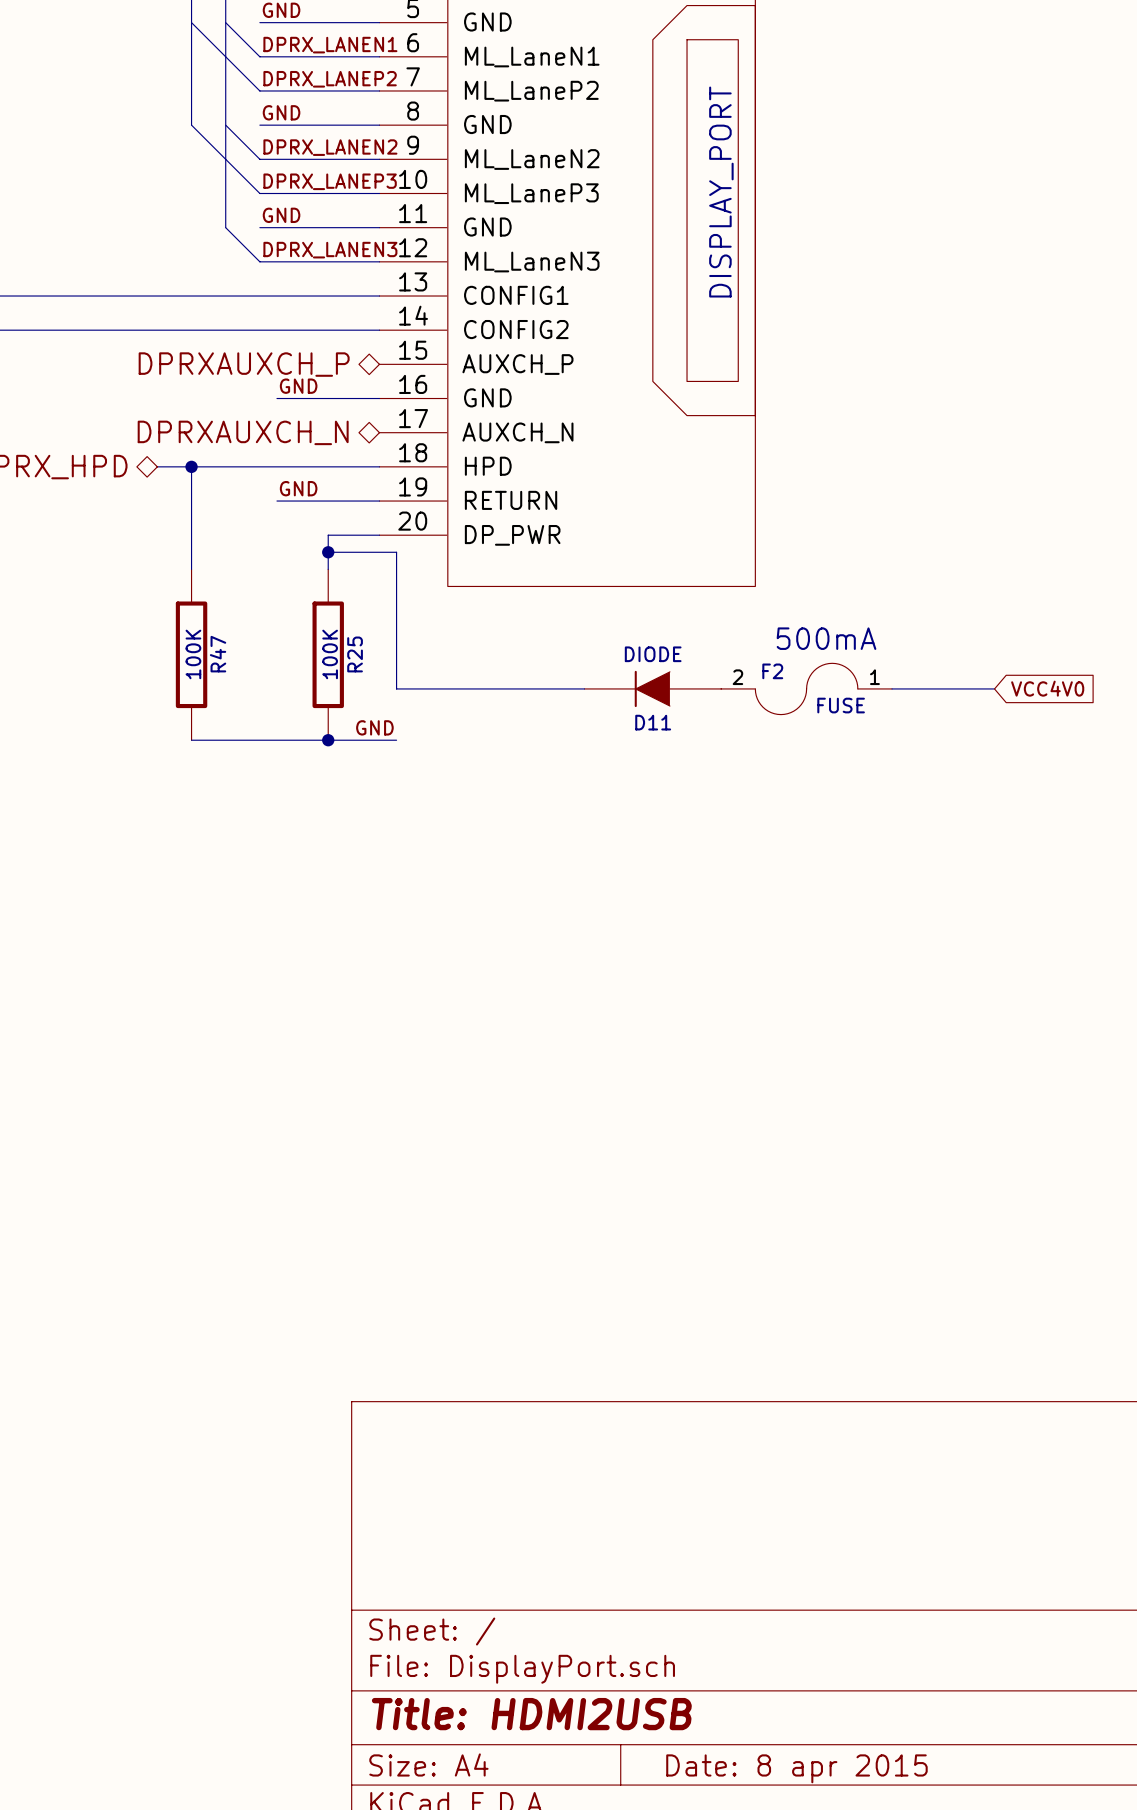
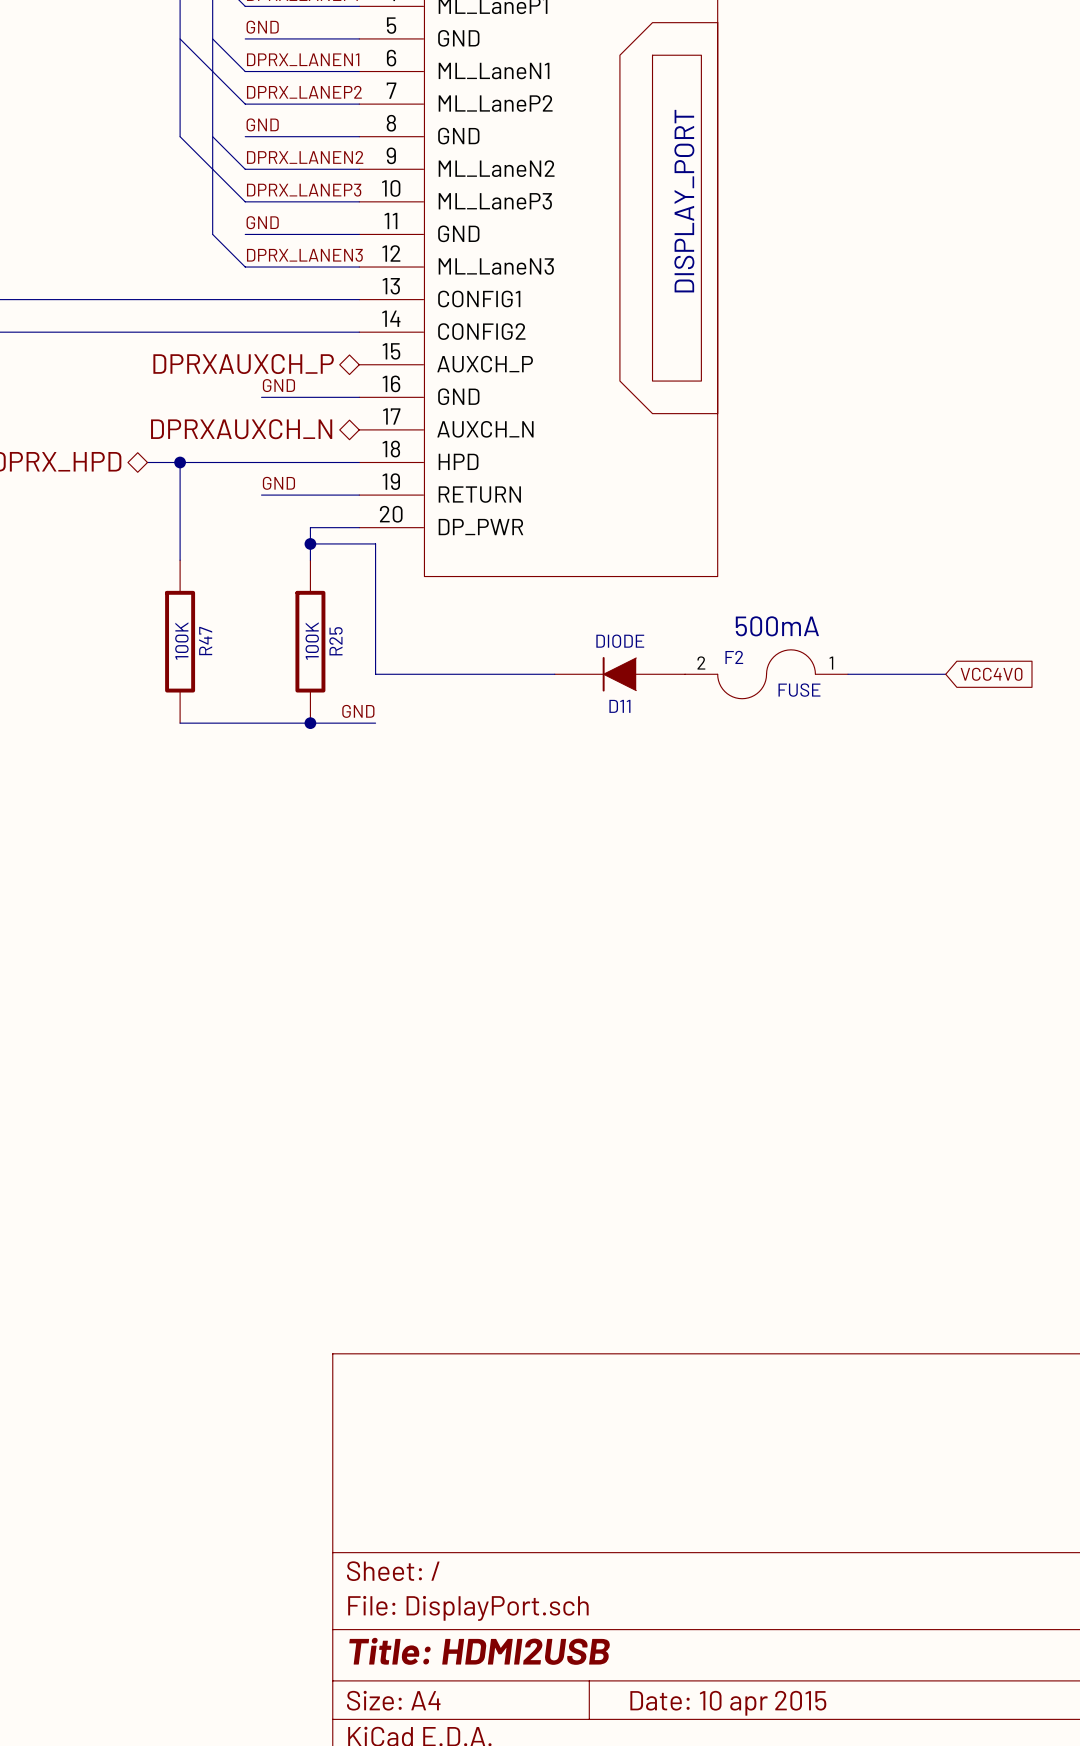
title block: Date: 8 apr 2015 (796, 1768) -> Date: 10 apr 2015 (728, 1703)

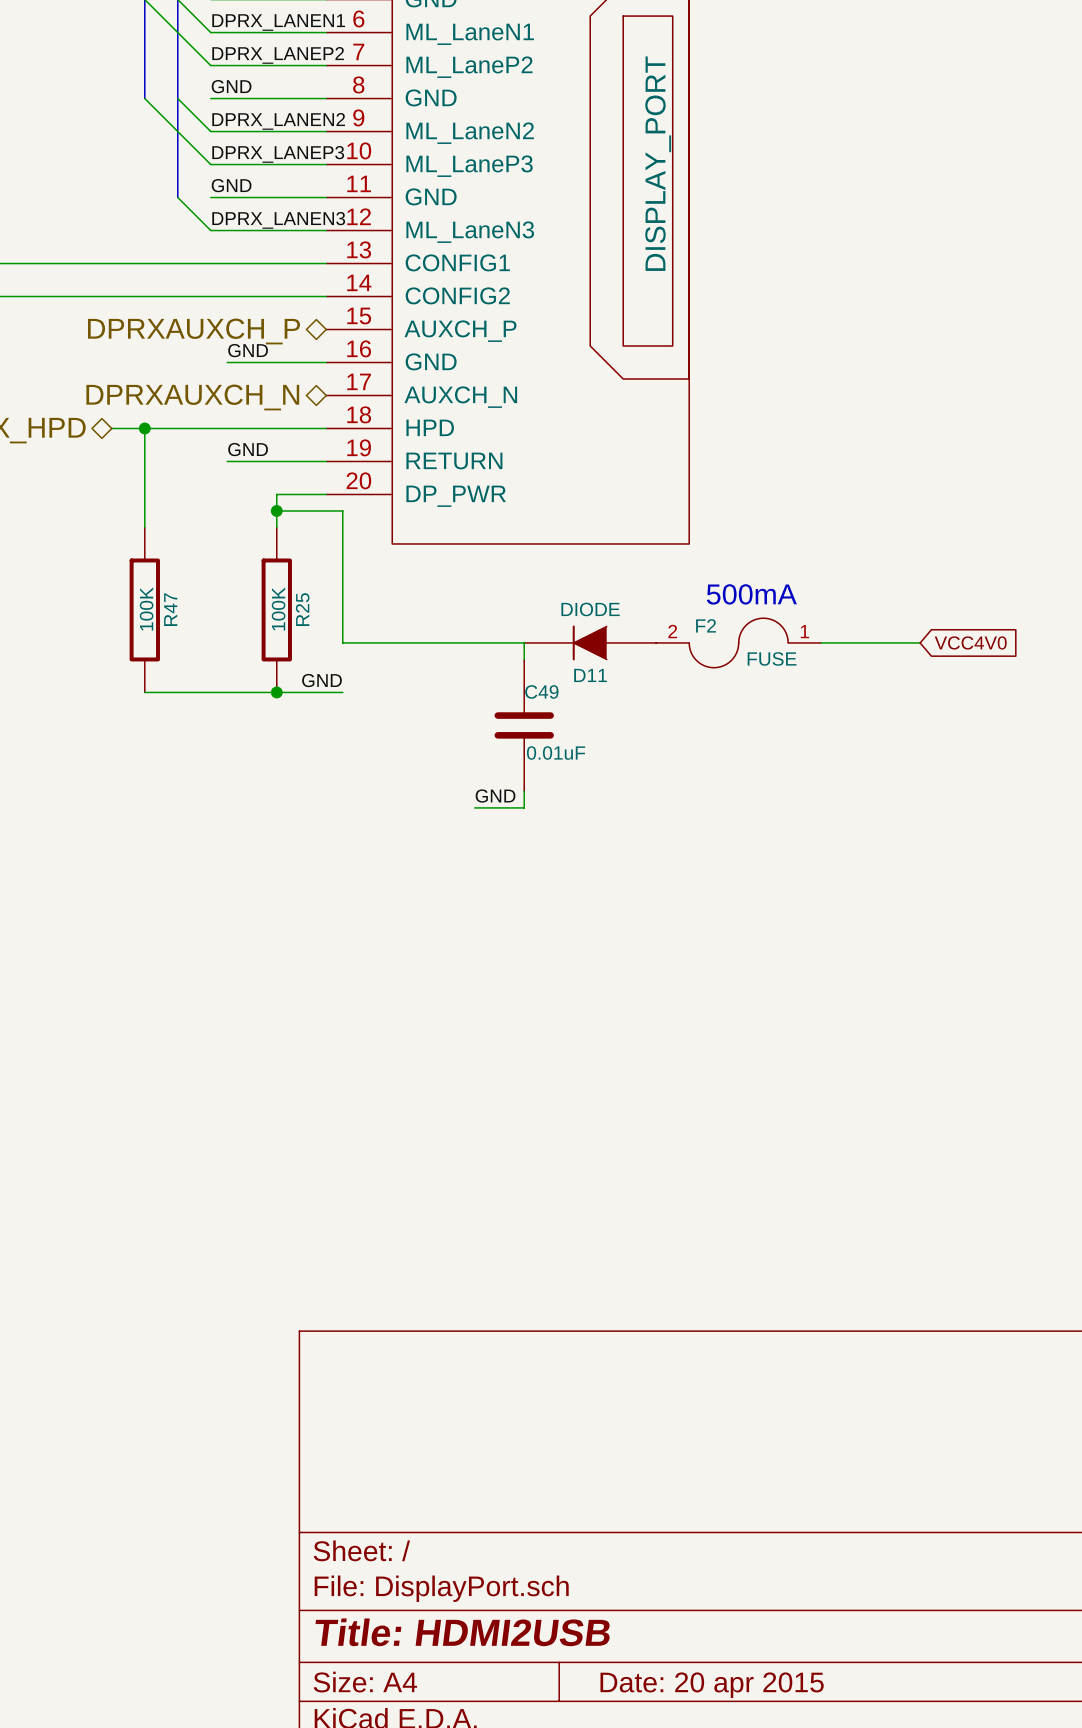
wire: none -> (524, 642) (524, 659)
C49: none -> 0.01uF (524, 725)
wire: none -> (524, 791) (524, 807) (474, 807)
label: none -> GND (495, 796)
title block: Date: 10 apr 2015 (728, 1703) -> Date: 20 apr 2015 (712, 1685)

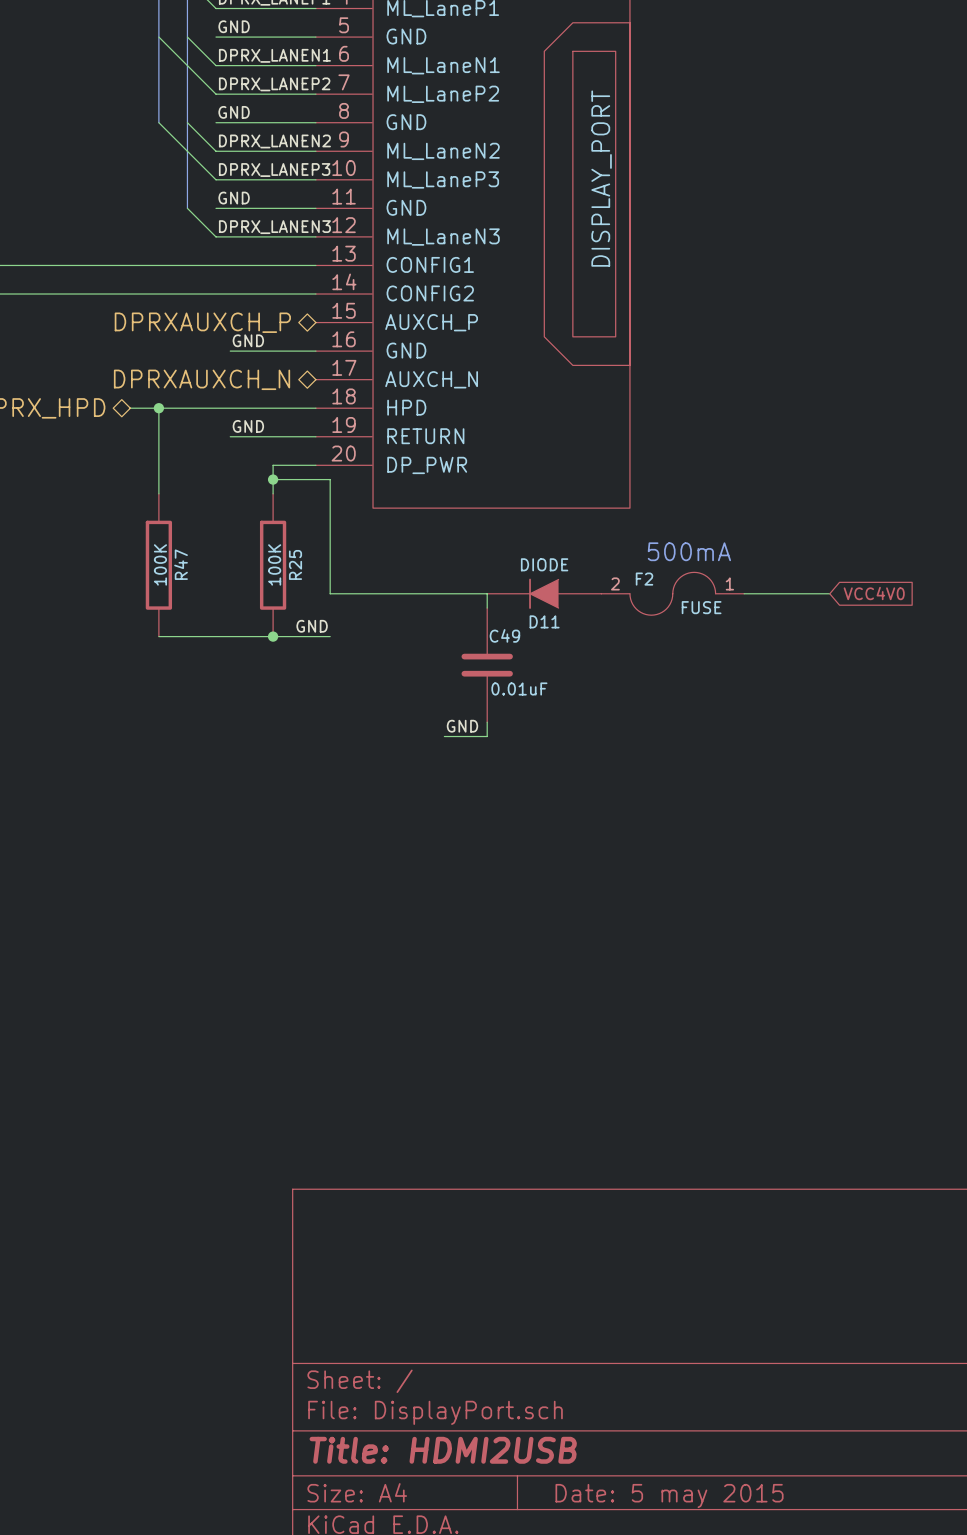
title block: Date: 20 apr 2015 (712, 1685) -> Date: 5 may 2015 (669, 1496)

